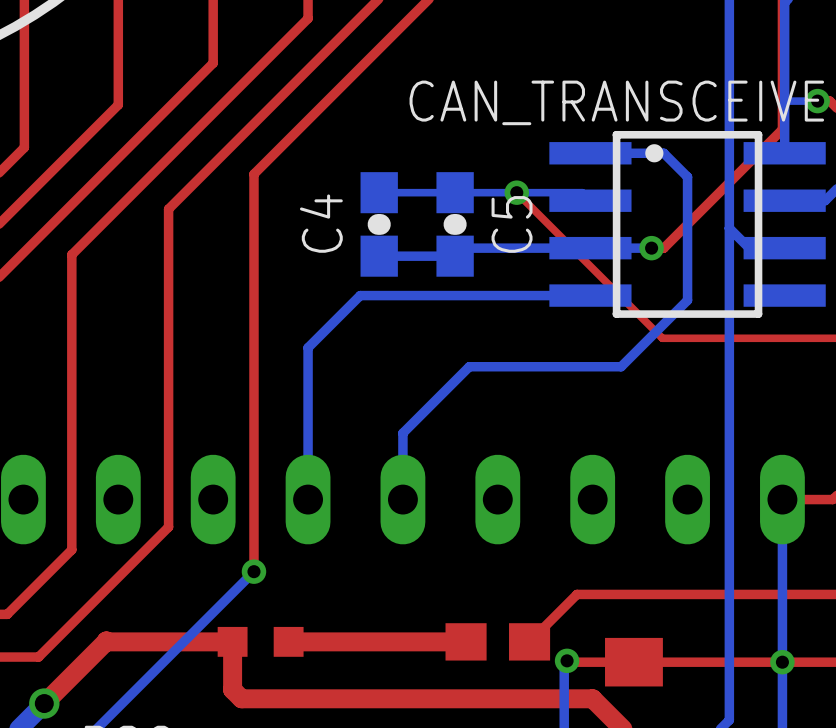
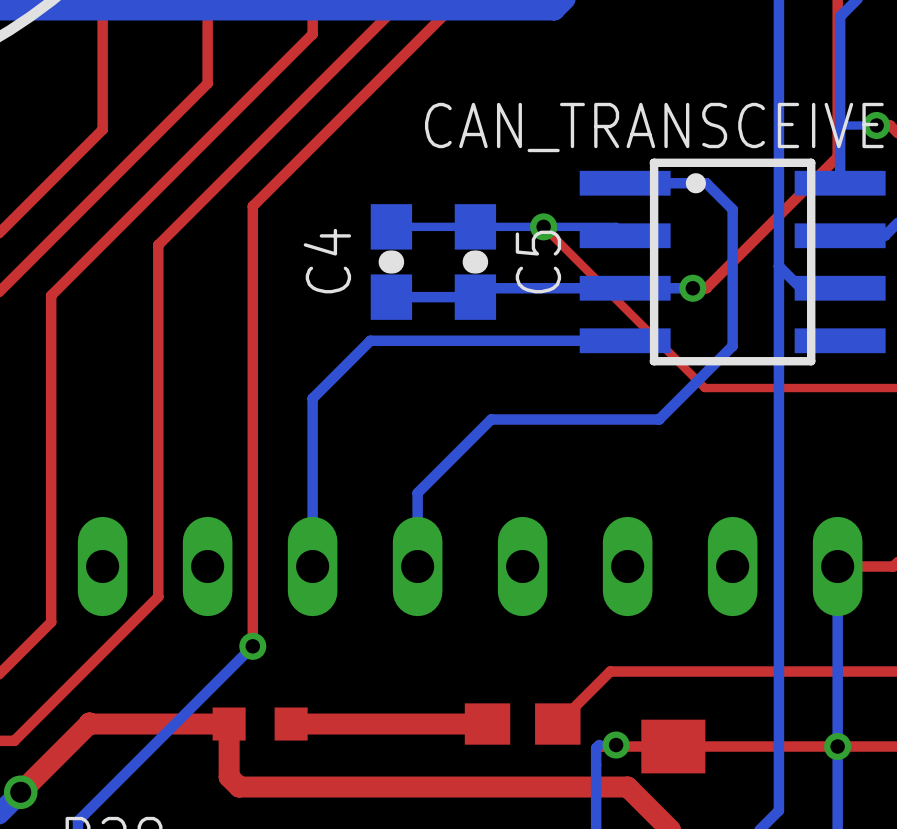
via position: (567, 660) -> (616, 745)

